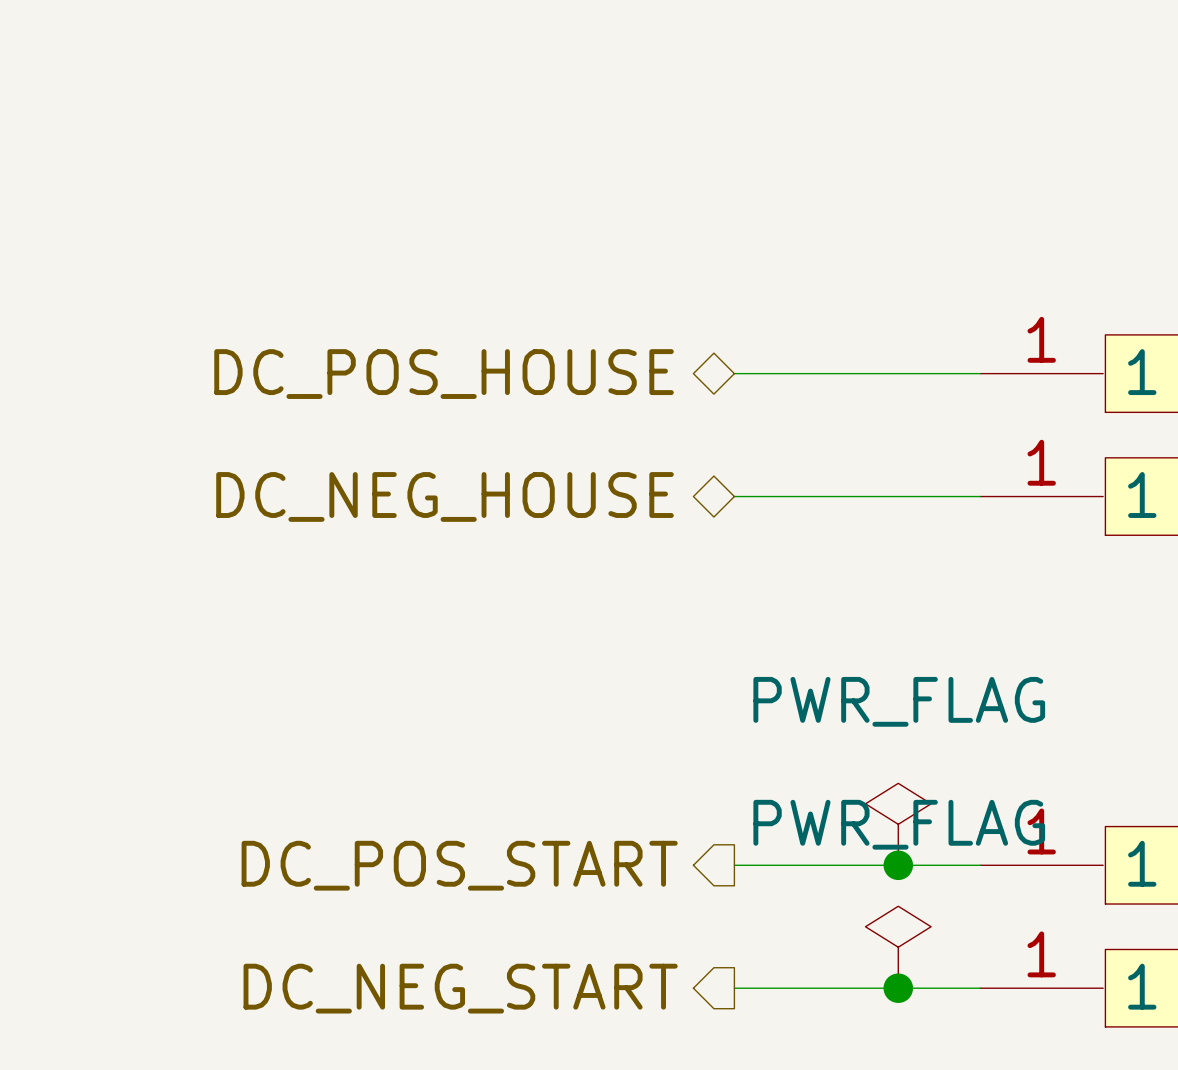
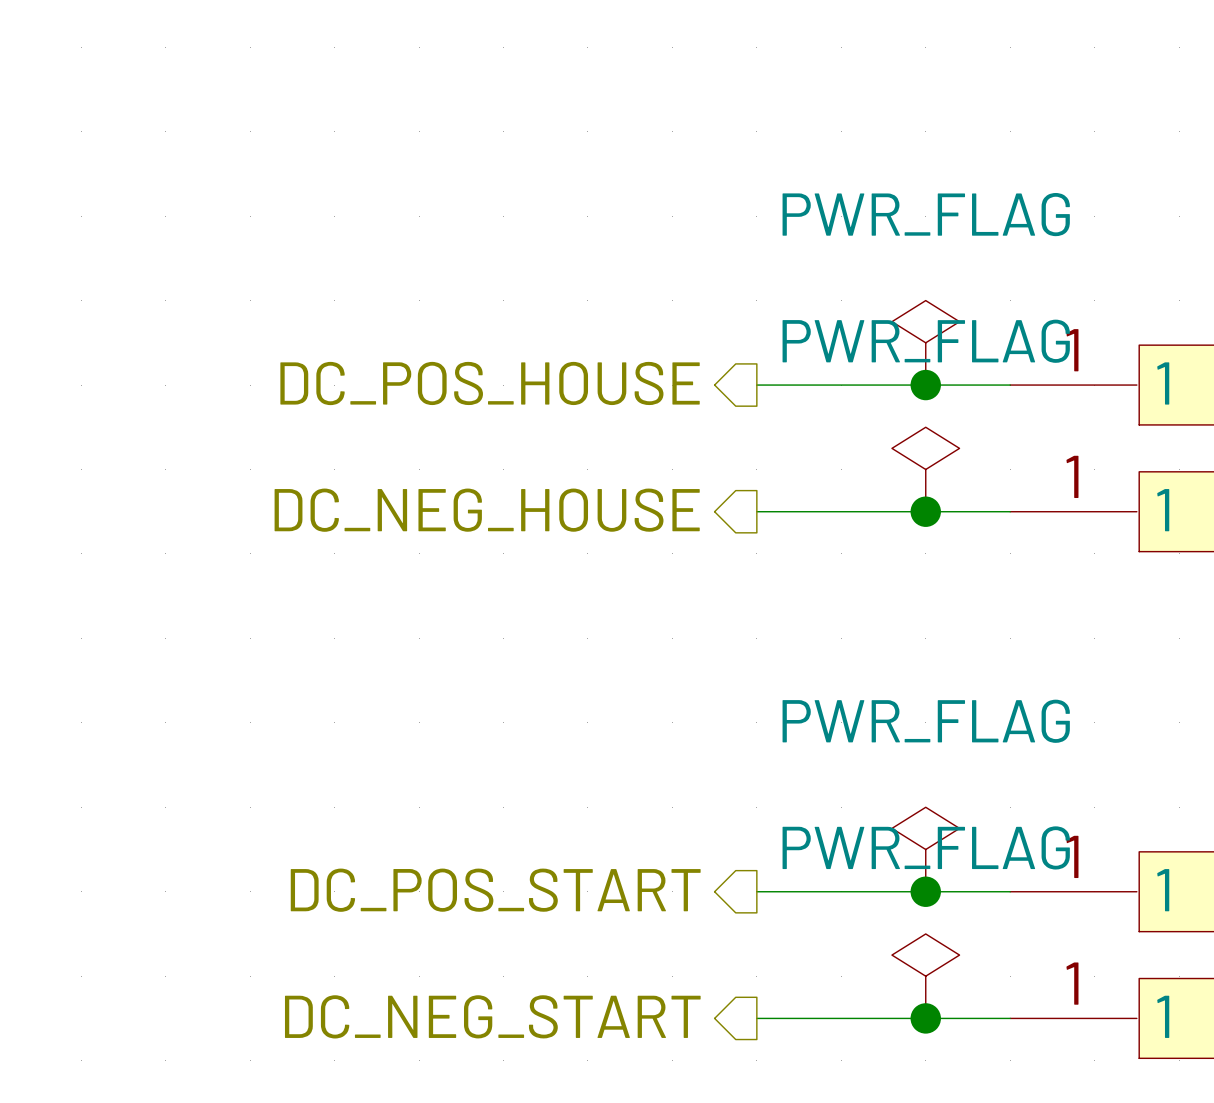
power symbol: none -> PWR_FLAG (925, 342)
junction: none -> (925, 385)
hierarchical label shape: bidirectional (444, 374) -> output (490, 383)
power symbol: none -> PWR_FLAG (925, 469)
hierarchical label shape: bidirectional (445, 496) -> output (487, 510)
junction: none -> (925, 511)

